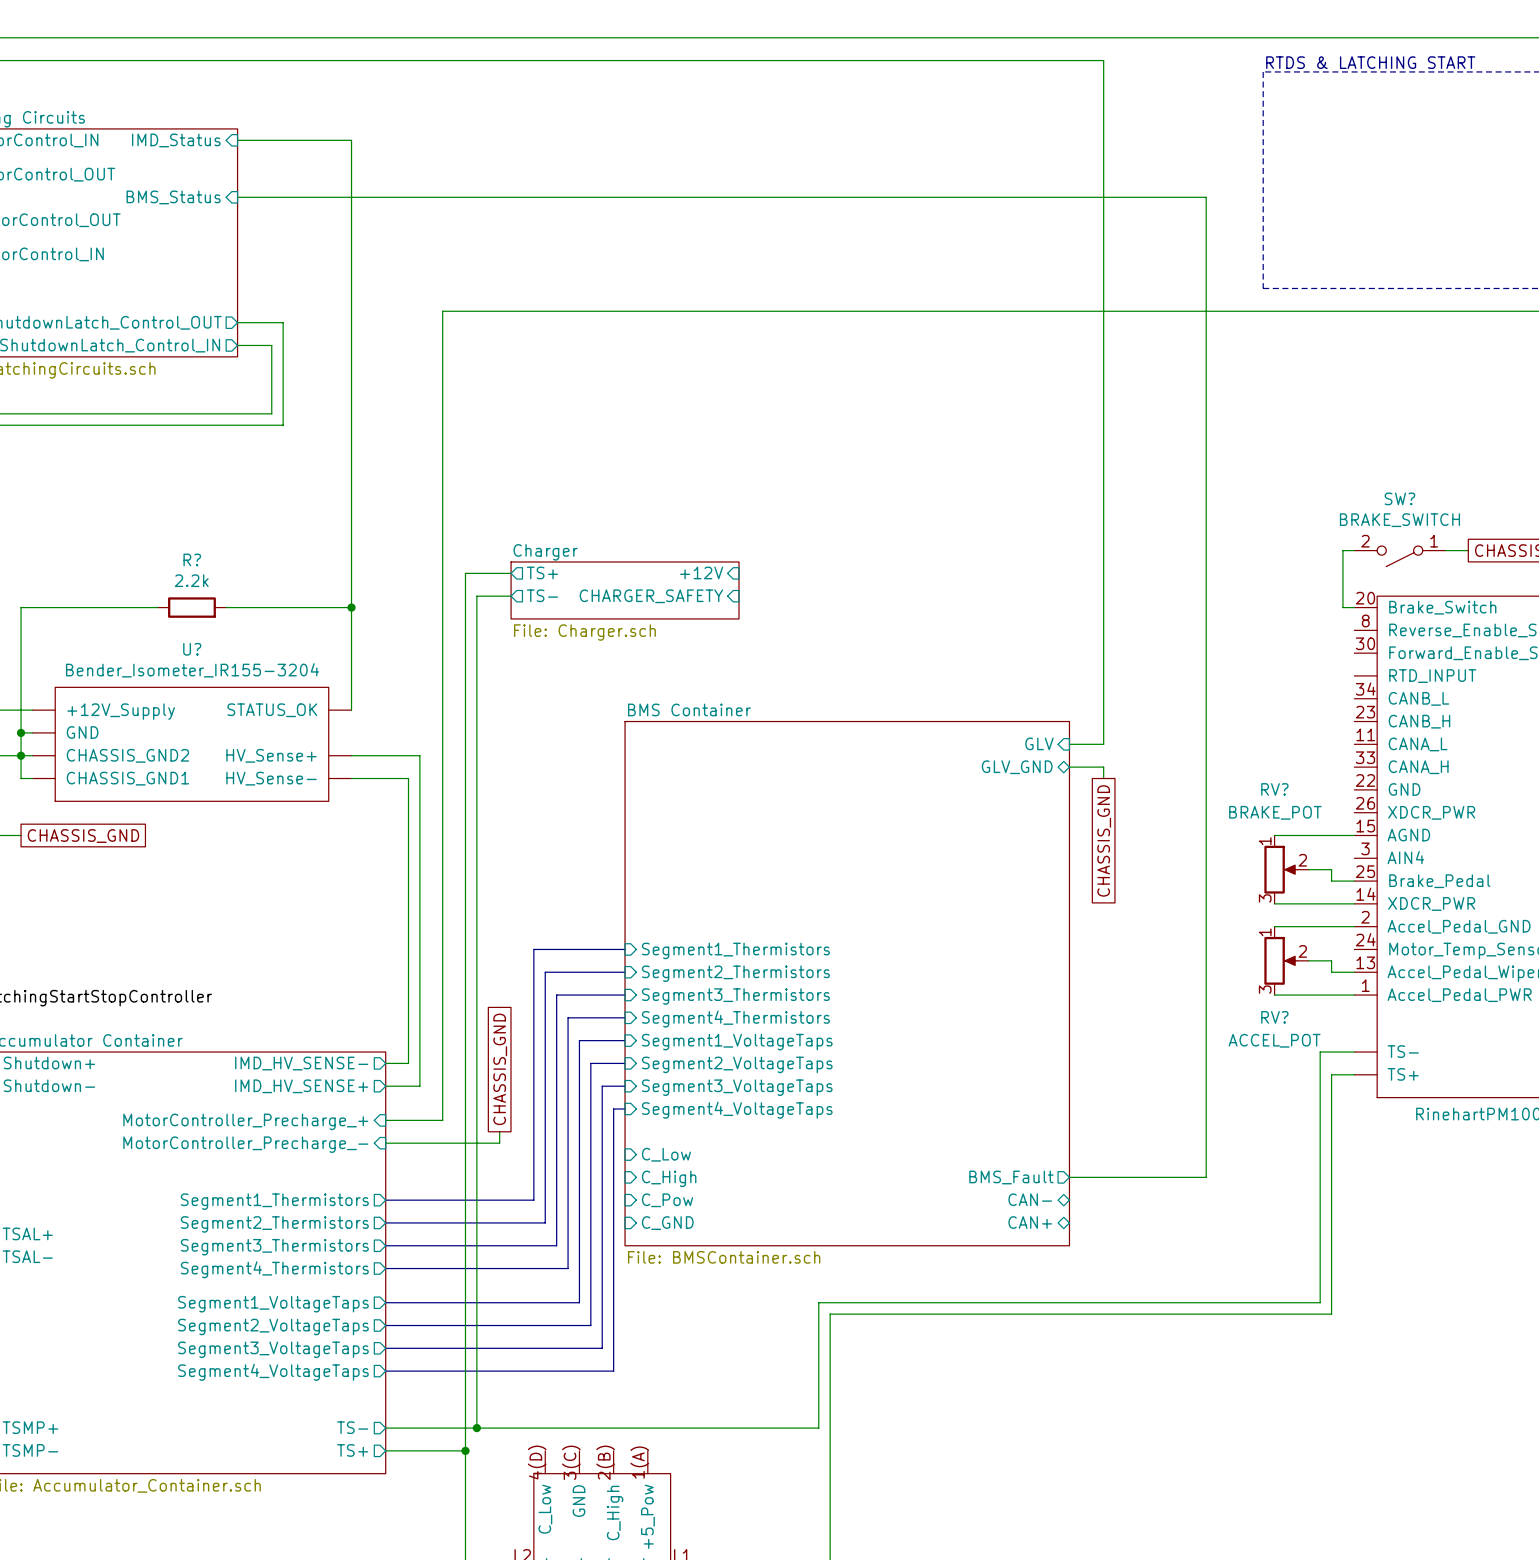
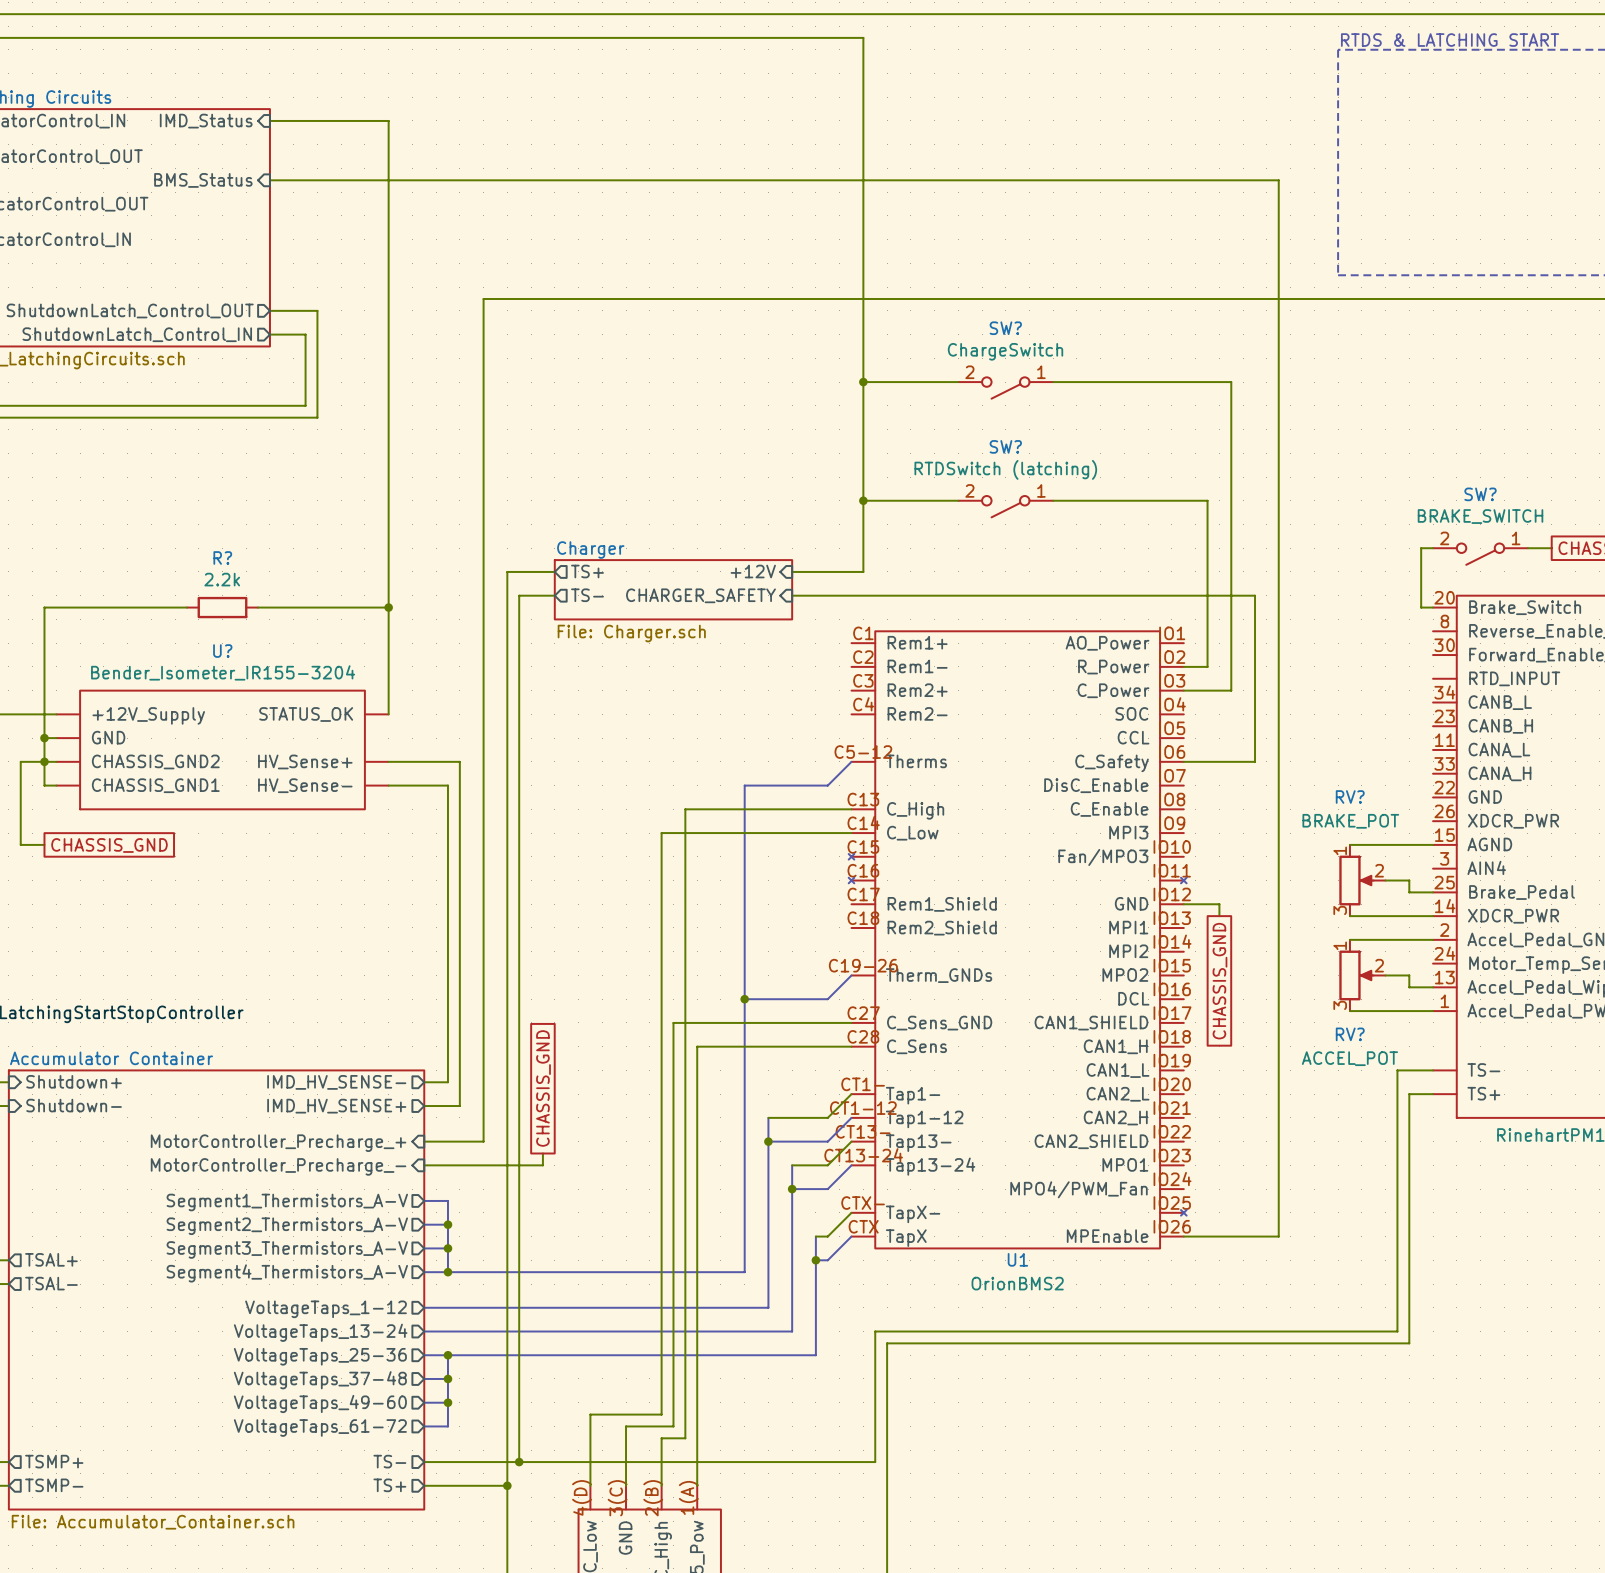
wire: (807, 60) (1103, 60) (1103, 744) (1069, 744) -> (863, 37) (863, 571) (792, 571)
wire: none -> (863, 382) (958, 382)
junction: none -> (863, 382)
wire: none -> (1053, 382) (1231, 382) (1231, 690) (1183, 690)
SW?: none -> ChargeSwitch (1005, 388)
wire: none -> (863, 500) (958, 500)
junction: none -> (863, 500)
wire: none -> (1053, 500) (1207, 500) (1207, 666) (1183, 666)
SW?: none -> RTDSwitch (latching) (1005, 506)
wire: none -> (792, 595) (1255, 595) (1255, 761) (1183, 761)
sheet pin: GLV (1039, 743) -> none
sheet pin: GLV_GND (1017, 767) -> none
wire: (1069, 767) (1103, 767) (1103, 778) -> (1183, 904) (1219, 904) (1219, 916)
wire: none -> (851, 809) (685, 809) (685, 1438) (661, 1438) (661, 1485)
wire: none -> (851, 833) (661, 833) (661, 1414) (590, 1414) (590, 1485)
global label position: CHASSIS_GND (1104, 840) -> CHASSIS_GND (1219, 981)
U1: none -> OrionBMS2 (1017, 939)
bus: (625, 949) (533, 949) (533, 1200) (408, 1200) -> none
sheet pin: Segment1_Thermistors (735, 950) -> none
bus: none -> (851, 975) (827, 999) (744, 999)
bus: (625, 972) (545, 972) (545, 1222) (408, 1222) -> none
sheet pin: Segment2_Thermistors (735, 973) -> none
junction: none -> (744, 999)
sheet BMS Container: File: BMSContainer.sch (847, 983) -> none
bus: (625, 995) (556, 995) (556, 1245) -> (851, 761) (827, 785) (744, 785) (744, 1272) (602, 1272)
sheet pin: Segment3_Thermistors (735, 996) -> none
wire: none -> (851, 1022) (673, 1022) (673, 1426) (626, 1426) (626, 1485)
bus: (625, 1017) (568, 1017) (568, 1268) (385, 1268) -> none
sheet pin: Segment4_Thermistors (735, 1019) -> none
wire: none -> (851, 1046) (697, 1046) (697, 1485)
bus: (625, 1040) (579, 1040) (579, 1302) -> (792, 1165) (792, 1331) (626, 1331)
sheet pin: Segment1_VoltageTaps (737, 1042) -> none
bus: (625, 1063) (590, 1063) (590, 1325) -> (815, 1236) (815, 1355) (637, 1355)
sheet pin: Segment2_VoltageTaps (737, 1064) -> none
wire: none -> (851, 1094) (827, 1117) (768, 1117)
bus: (625, 1086) (602, 1086) (602, 1348) (408, 1348) -> none
sheet pin: Segment3_VoltageTaps (737, 1087) -> none
bus: none -> (768, 1117) (768, 1307) (424, 1307)
bus: none -> (851, 1117) (827, 1141) (768, 1141)
bus: (625, 1108) (613, 1108) (613, 1371) (408, 1371) -> none
sheet pin: Segment4_VoltageTaps (737, 1110) -> none
junction: none -> (768, 1141)
wire: none -> (851, 1141) (827, 1165) (792, 1165)
bus: none -> (851, 1165) (827, 1189) (792, 1189)
sheet pin: C_Low (666, 1154) -> none
junction: none -> (792, 1189)
bus: none -> (424, 1200) (447, 1200) (447, 1272)
sheet pin: BMS_Fault (1011, 1177) -> none
wire: (1069, 1177) (1206, 1177) -> (1183, 1236) (1278, 1236) (1278, 1200)
sheet pin: none -> Segment1_Thermistors_A-V (287, 1202)
sheet pin: C_High (669, 1178) -> none
wire: none -> (851, 1212) (827, 1236) (815, 1236)
sheet pin: CAN- (1030, 1199) -> none
junction: none -> (447, 1224)
sheet pin: C_Pow (667, 1200) -> none
sheet pin: Segment1_Thermistors (274, 1201) -> Segment2_Thermistors_A-V (287, 1226)
bus: none -> (851, 1236) (827, 1260) (815, 1260)
junction: none -> (447, 1248)
sheet pin: CAN+ (1030, 1222) -> none
sheet pin: C_GND (667, 1223) -> none
sheet pin: Segment2_Thermistors (274, 1224) -> Segment3_Thermistors_A-V (287, 1249)
junction: none -> (815, 1260)
junction: none -> (447, 1272)
sheet pin: Segment3_Thermistors (274, 1247) -> Segment4_Thermistors_A-V (287, 1273)
sheet pin: Segment4_Thermistors (274, 1269) -> none
sheet pin: none -> VoltageTaps_1-12 (326, 1309)
sheet pin: Segment1_VoltageTaps (273, 1304) -> VoltageTaps_13-24 (320, 1332)
bus: none -> (447, 1355) (447, 1426) (424, 1426)
junction: none -> (447, 1355)
sheet pin: Segment2_VoltageTaps (273, 1326) -> VoltageTaps_25-36 (320, 1356)
junction: none -> (447, 1378)
sheet pin: Segment3_VoltageTaps (273, 1349) -> VoltageTaps_37-48 (320, 1380)
junction: none -> (447, 1402)
sheet pin: Segment4_VoltageTaps (273, 1372) -> VoltageTaps_49-60 (320, 1403)
sheet pin: none -> VoltageTaps_61-72 (320, 1427)

